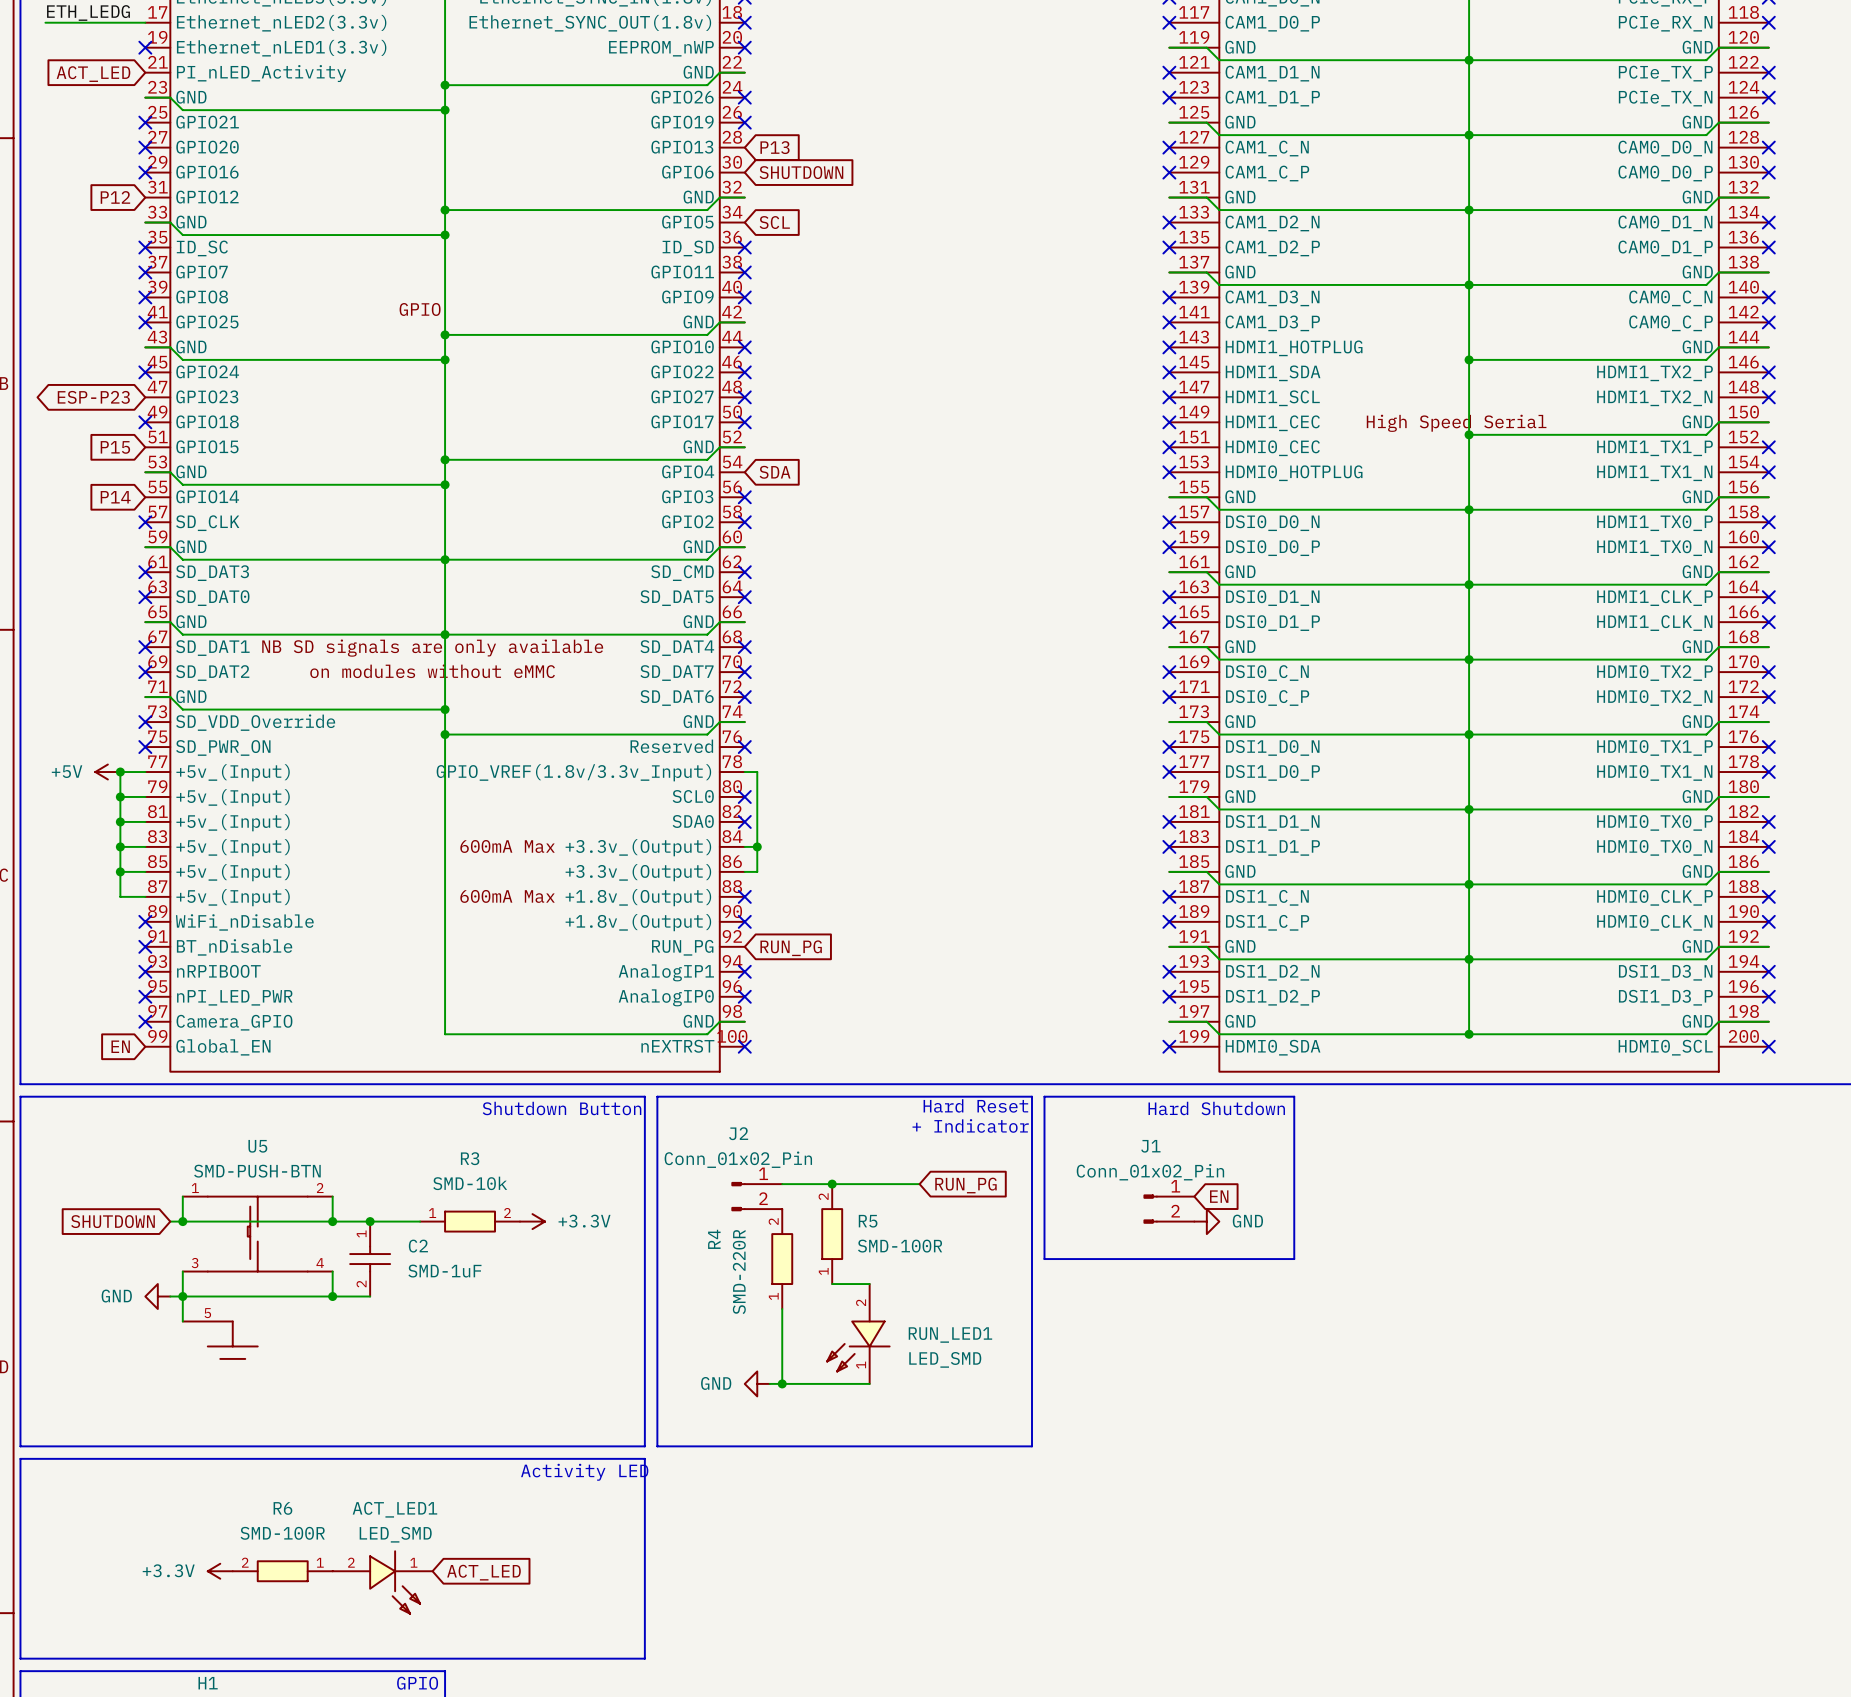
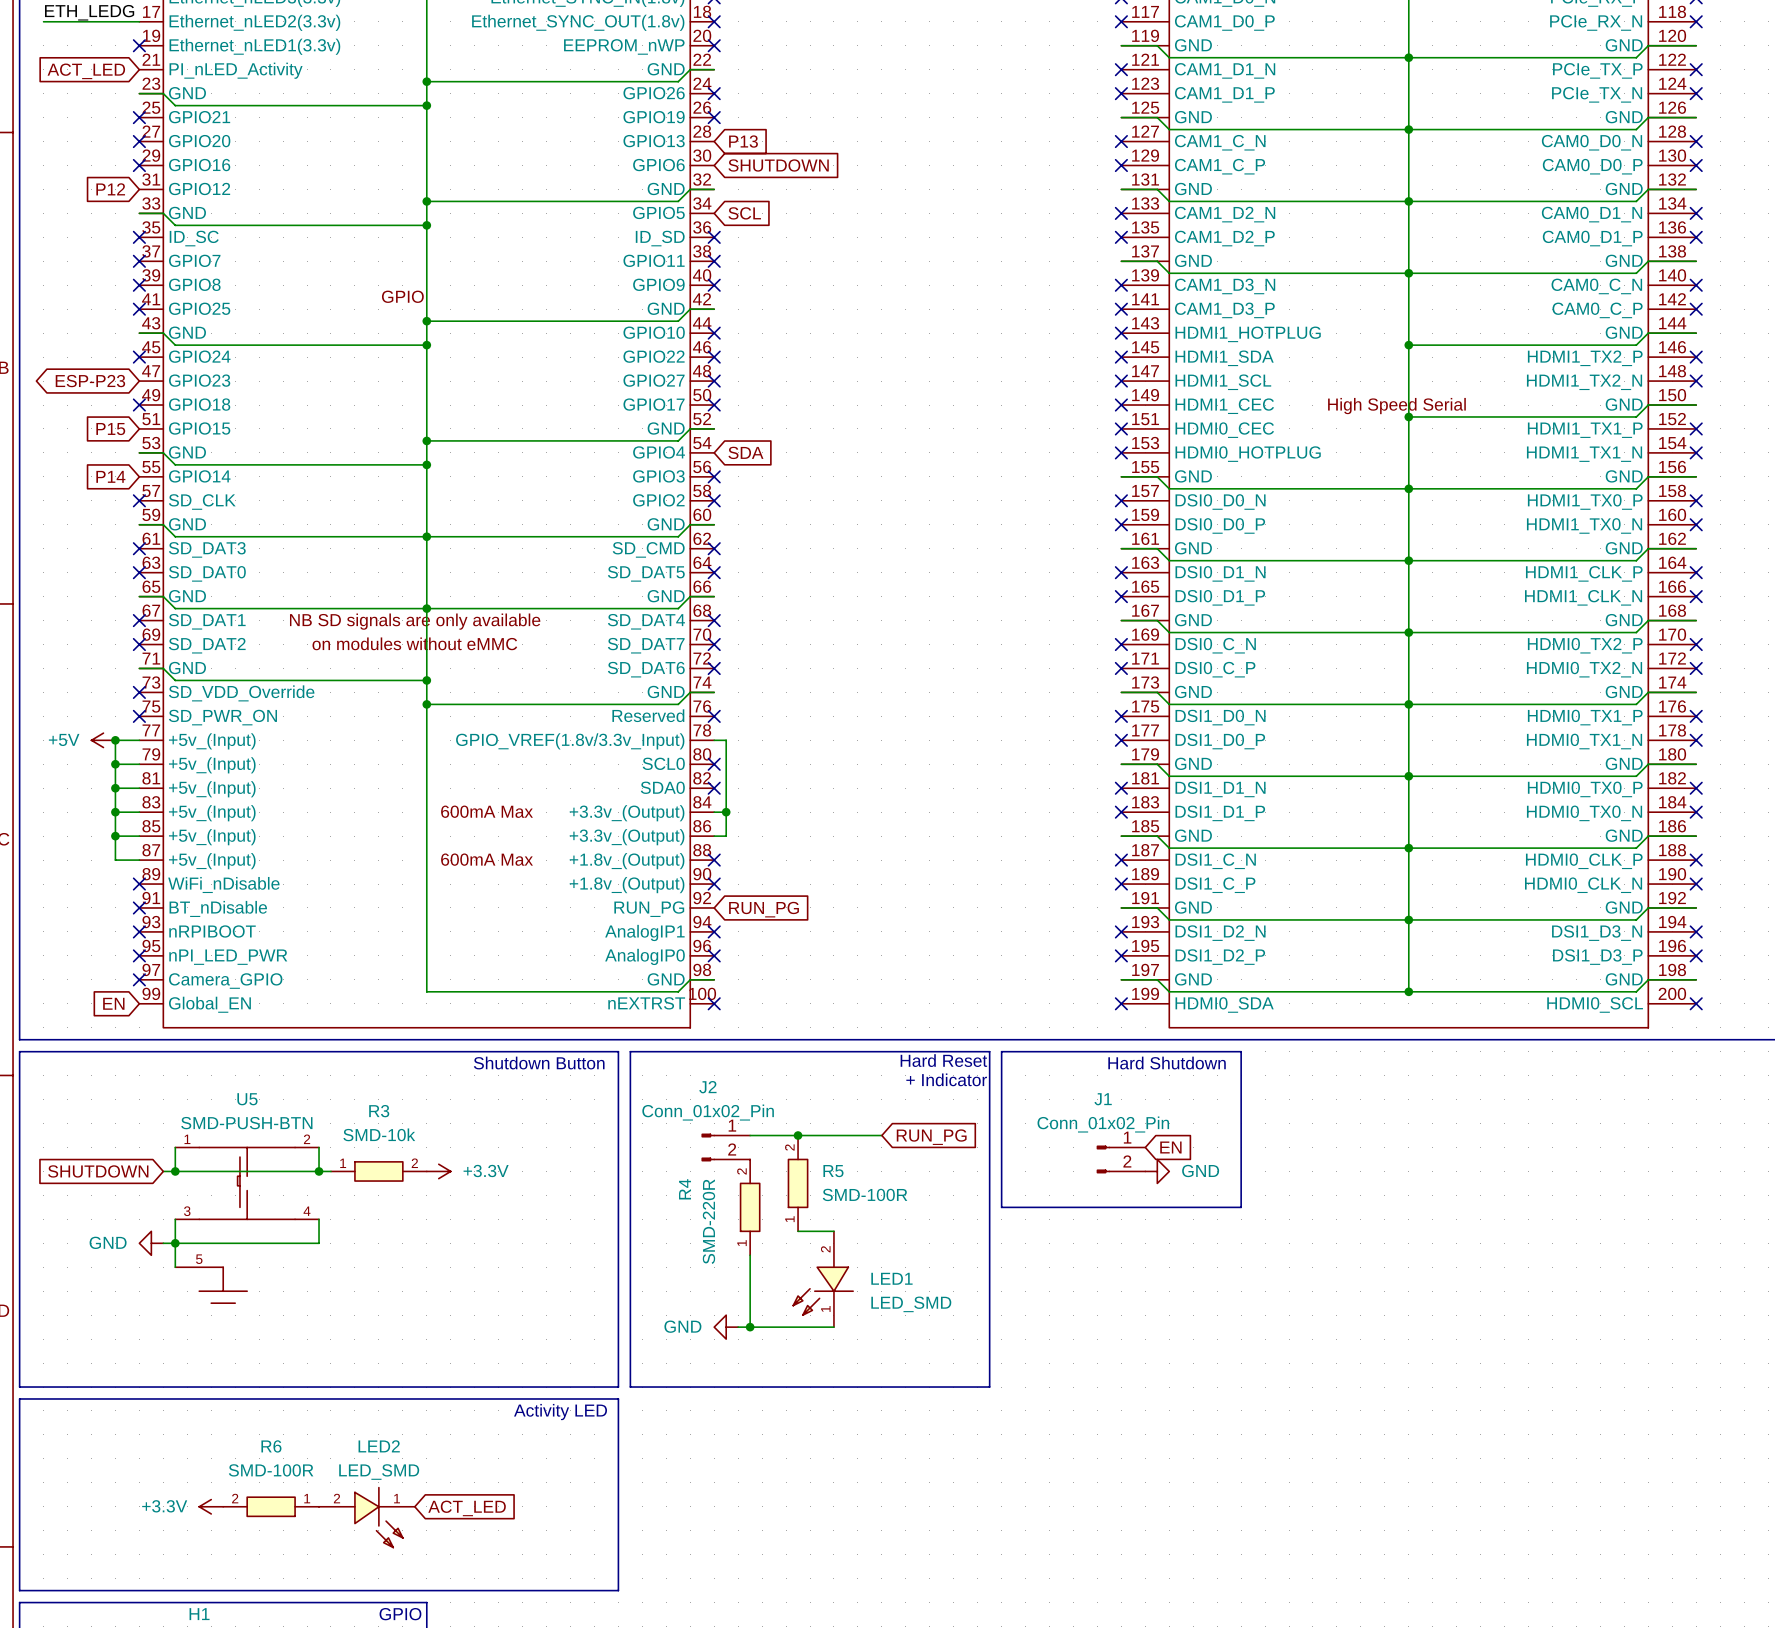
junction: (370, 1221) -> none
R3 position: (470, 1221) -> (378, 1171)
power symbol position: +3.3V (532, 1221) -> +3.3V (438, 1171)
C2: SMD-1uF (370, 1259) -> none
wire: (332, 1296) (370, 1296) -> none
junction: (332, 1296) -> none
RUN_LED1 name: RUN_LED1 (950, 1335) -> LED1 (891, 1278)
ACT_LED1 name: ACT_LED1 (394, 1509) -> LED2 (379, 1446)

